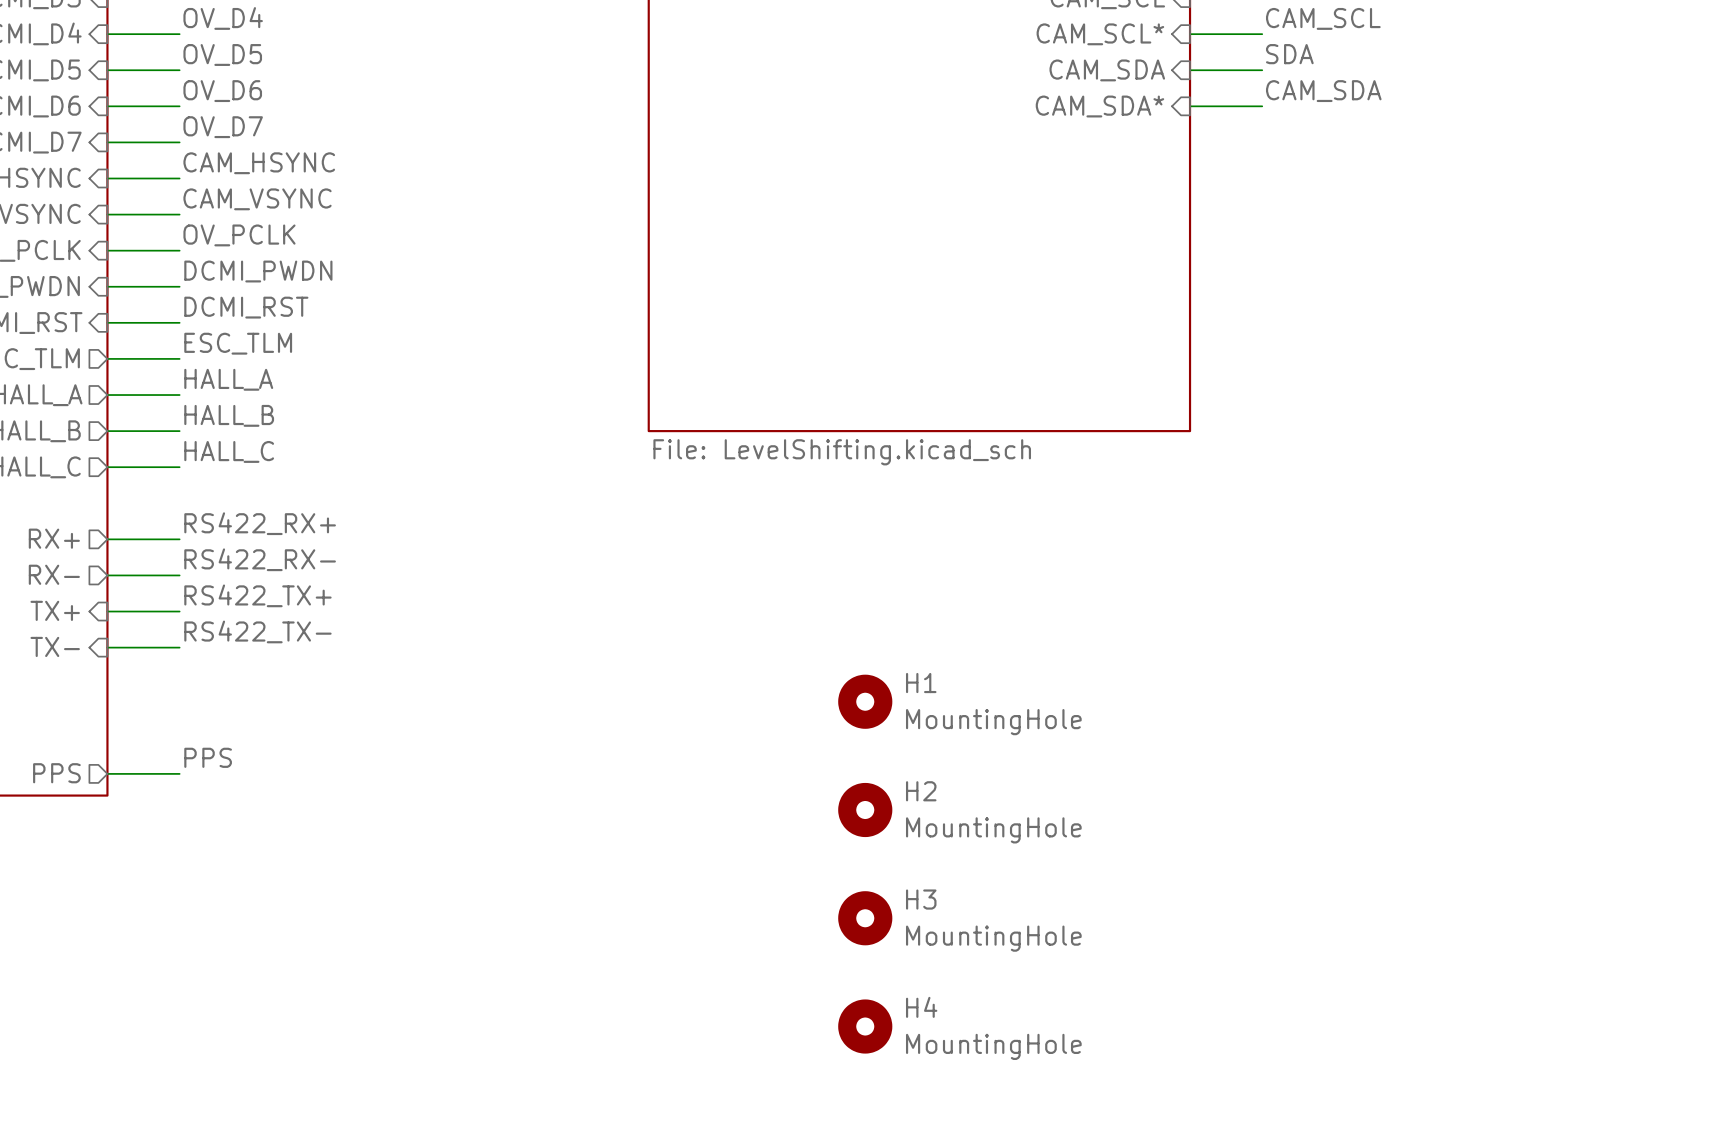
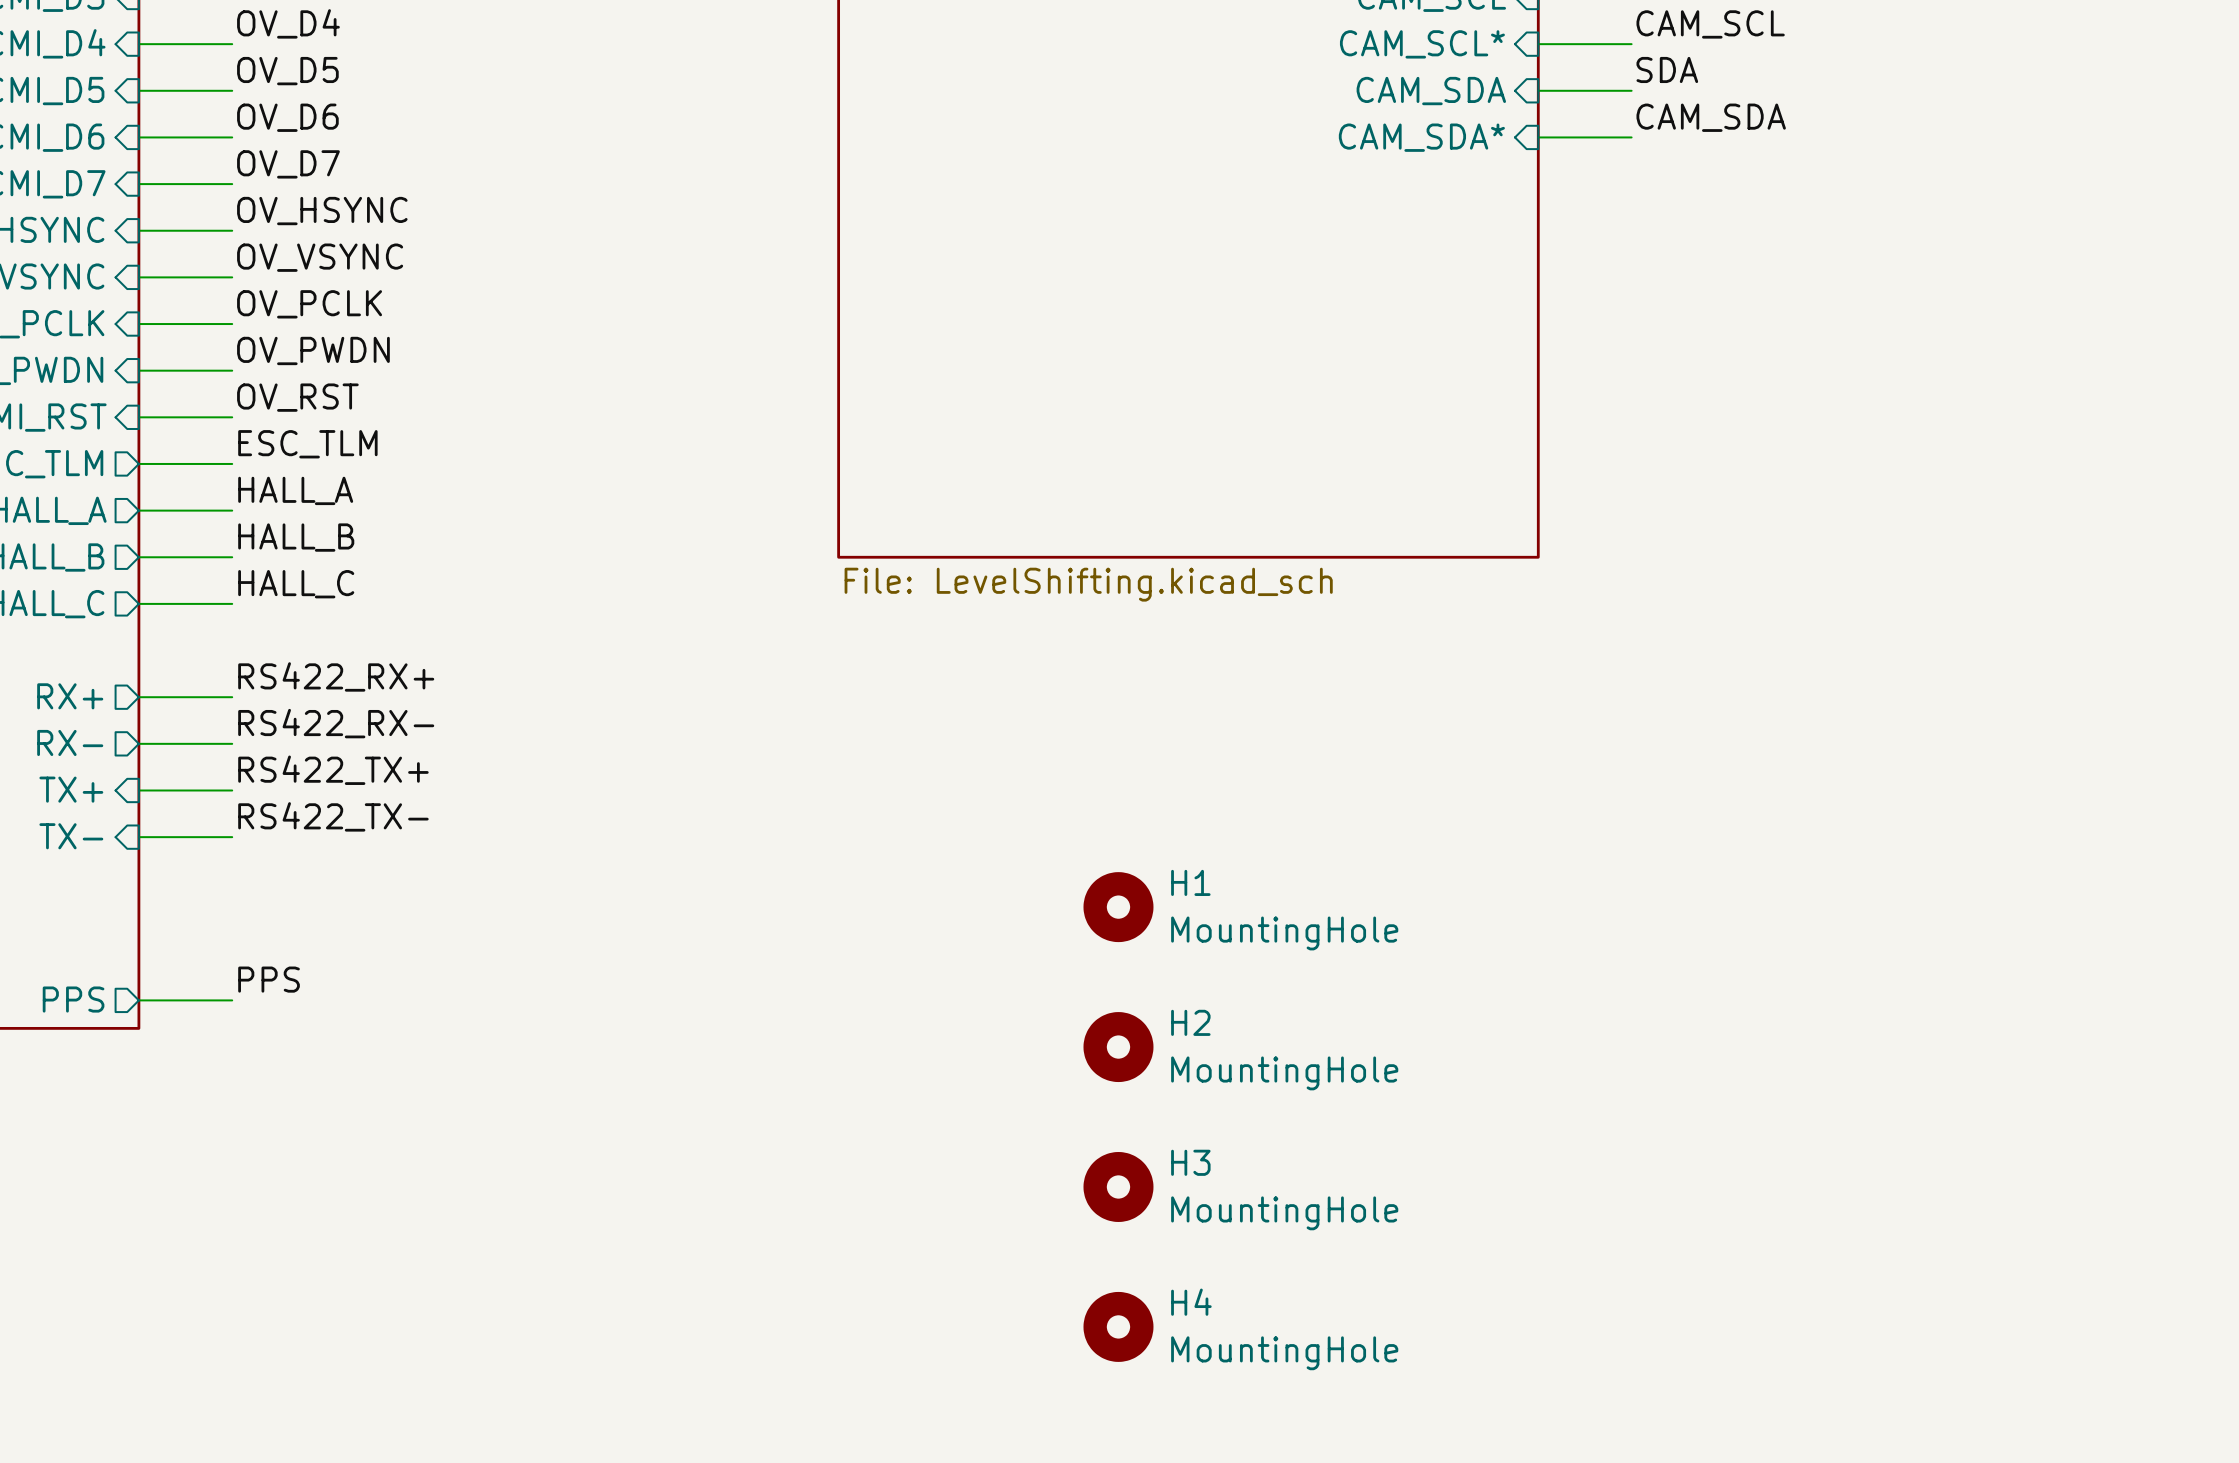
label: CAM_HSYNC (259, 163) -> OV_HSYNC (322, 211)
label: CAM_VSYNC (257, 199) -> OV_VSYNC (320, 257)
label: DCMI_PWDN (258, 271) -> OV_PWDN (313, 350)
label: DCMI_RST (246, 307) -> OV_RST (297, 397)

